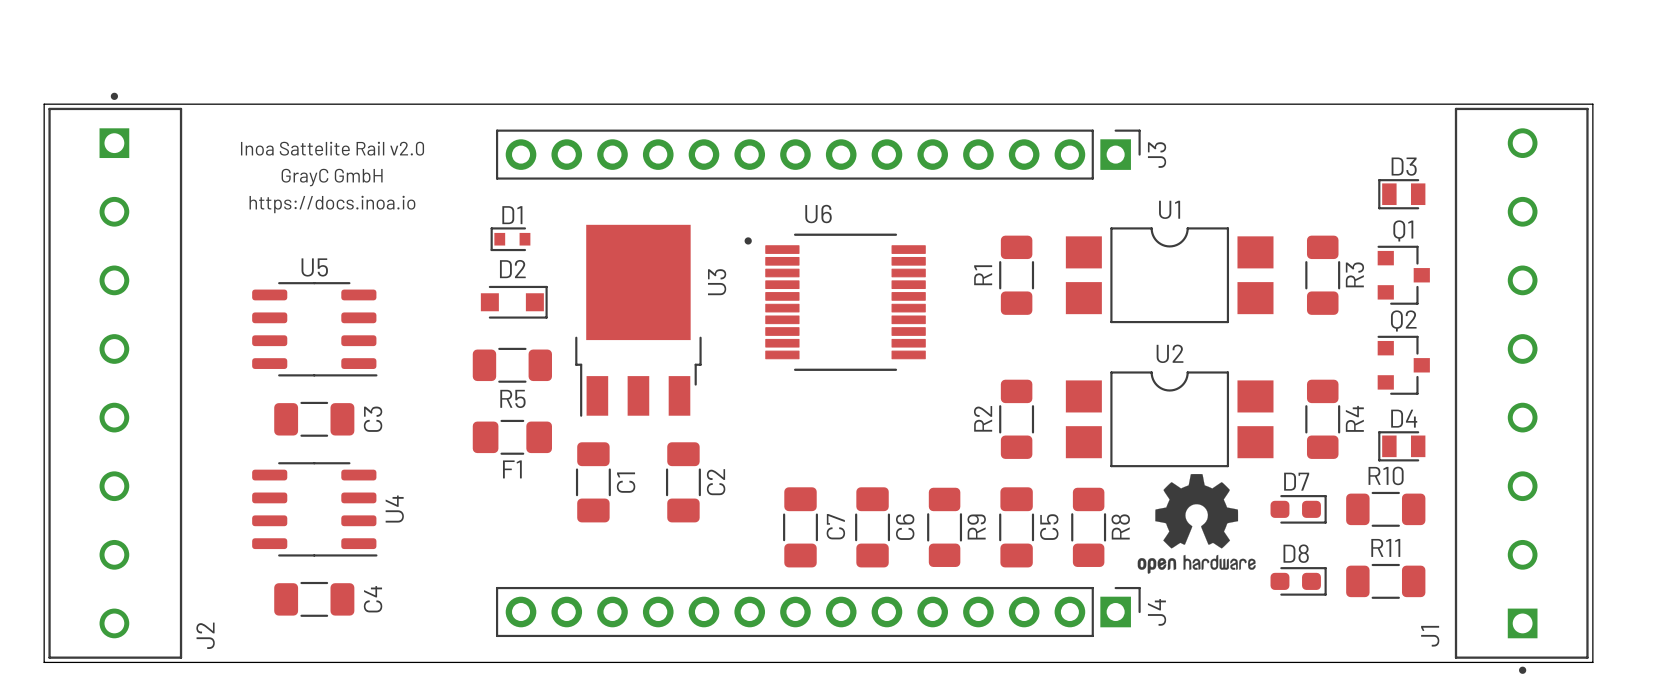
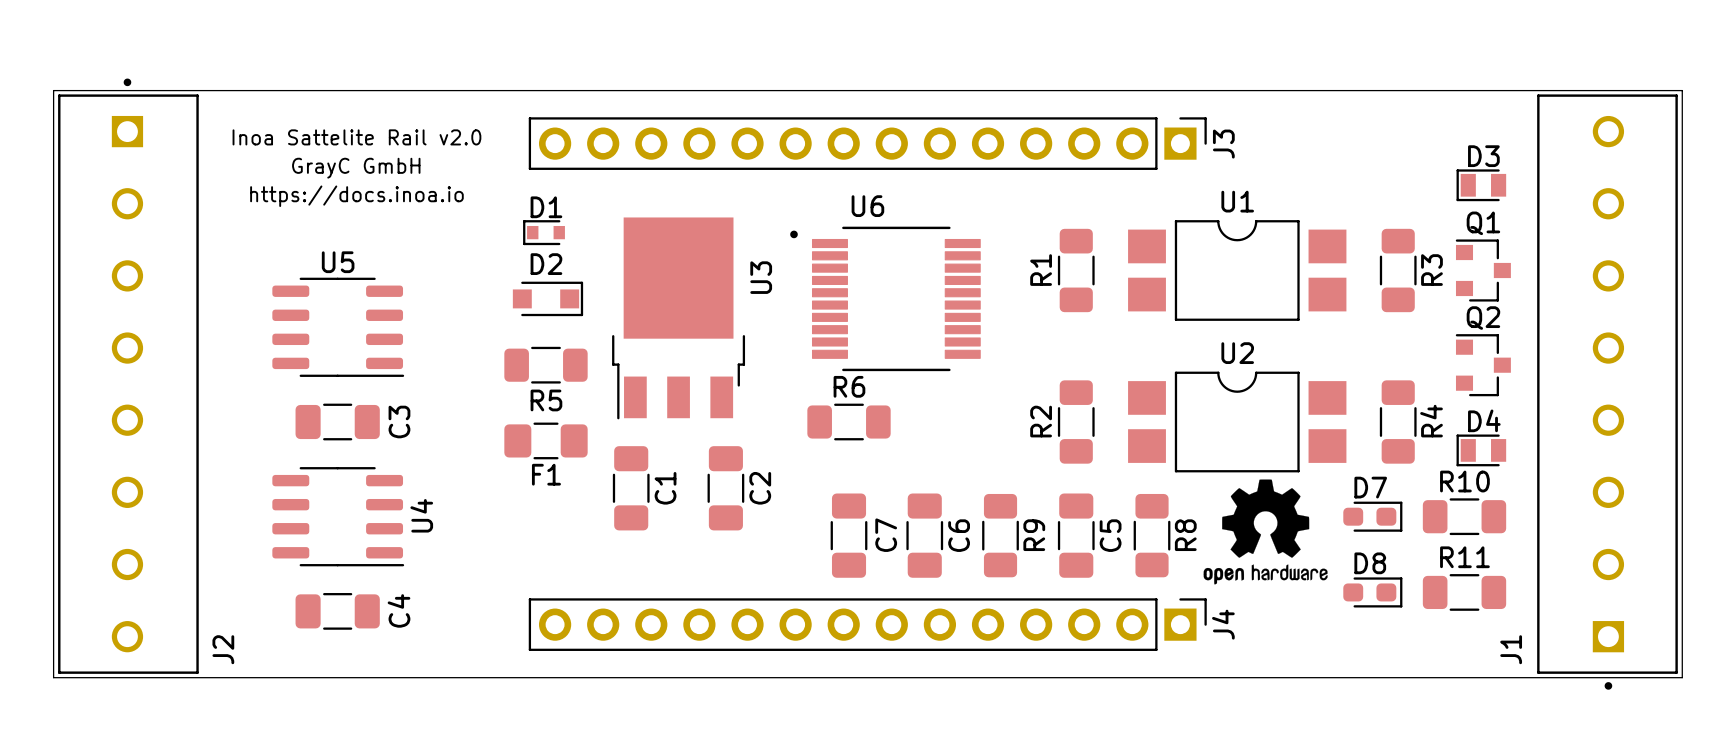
R6: none -> (849, 422)

